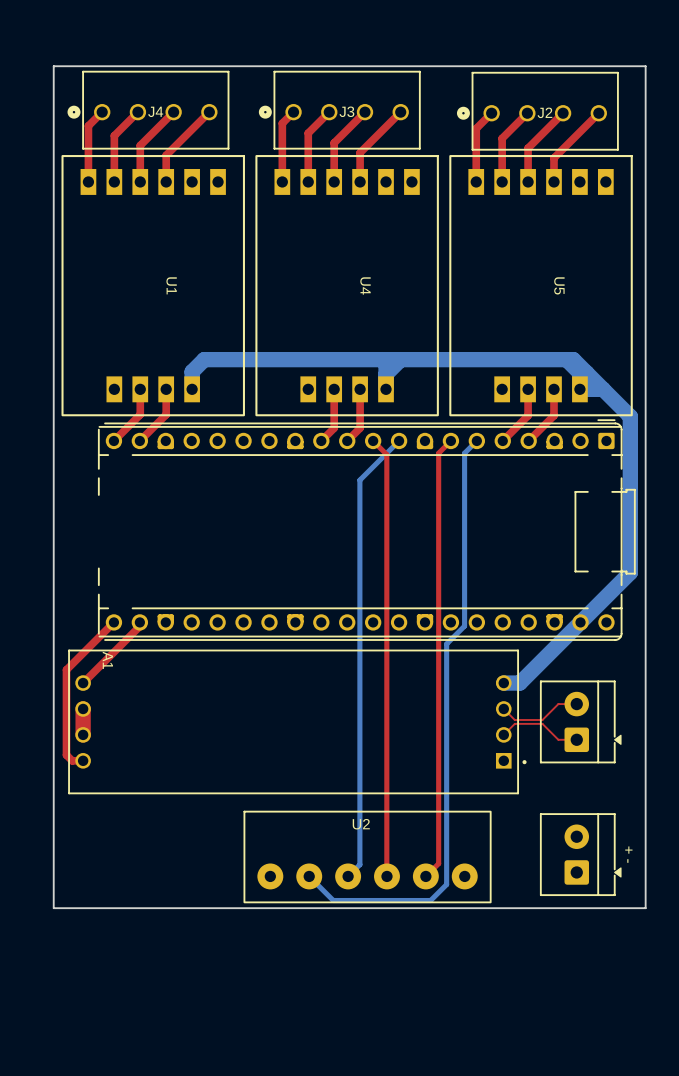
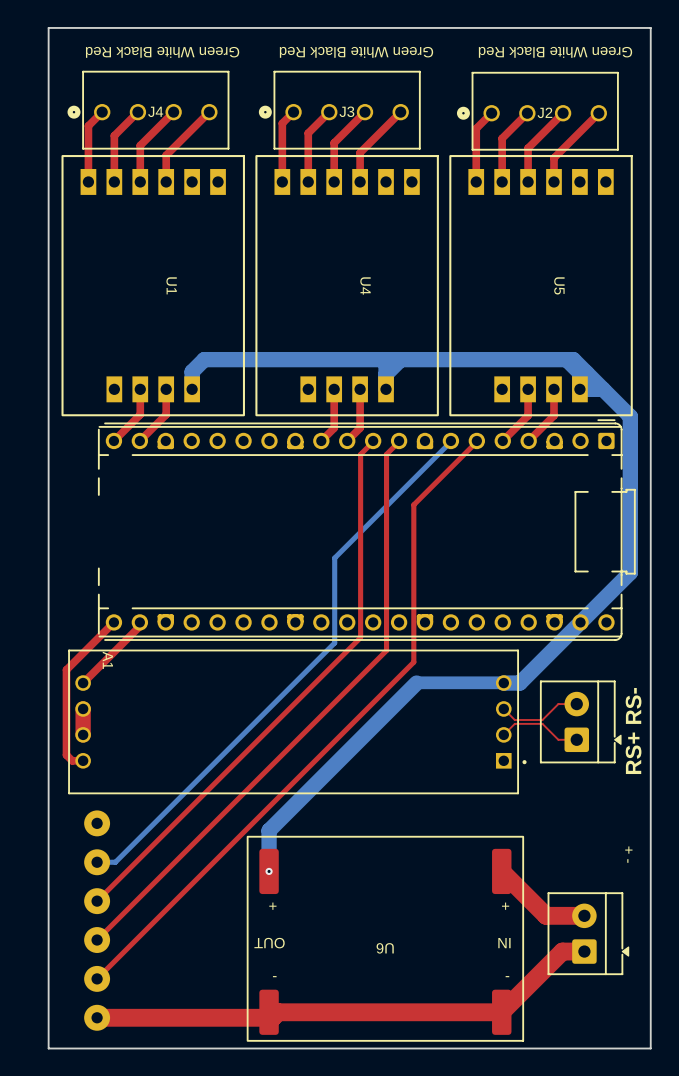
text: none -> Green White Black Red (162, 52)
text: none -> Green White Black Red (356, 52)
text: none -> Green White Black Red (555, 52)
board edge: (53, 66) (645, 66) (645, 908) (53, 908) (53, 66) -> (48, 27) (48, 1048) (650, 1048) (650, 27) (48, 27)
top track: (373, 440) (386, 454) (386, 876) -> none
top track: none -> (374, 440) (360, 454) (360, 637) (97, 901)
bottom track: (399, 440) (359, 480) (359, 864) (348, 876) -> none
top track: none -> (400, 440) (386, 454) (386, 650) (97, 940)
top track: (450, 440) (438, 453) (438, 863) (425, 876) -> none
bottom track: none -> (452, 440) (334, 558) (334, 642) (115, 862) (97, 862)
bottom track: (476, 440) (464, 453) (464, 626) (446, 644) (446, 884) (430, 900) (333, 900) (309, 876) -> none
top track: none -> (477, 440) (413, 504) (413, 662) (97, 978)
bottom track: none -> (521, 682) (416, 682) (269, 830) (269, 871)
text: none -> RS+ RS- (633, 731)
part position: (580, 854) -> (588, 933)
U2: (367, 857) -> none
via: none -> (269, 871)
top track: none -> (501, 871) (546, 915) (584, 915)
part: none -> (97, 920)
U6: none -> (385, 938)
top track: none -> (584, 951) (562, 951) (501, 1012) (269, 1012)
top track: none -> (278, 1012) (272, 1017) (97, 1017)

